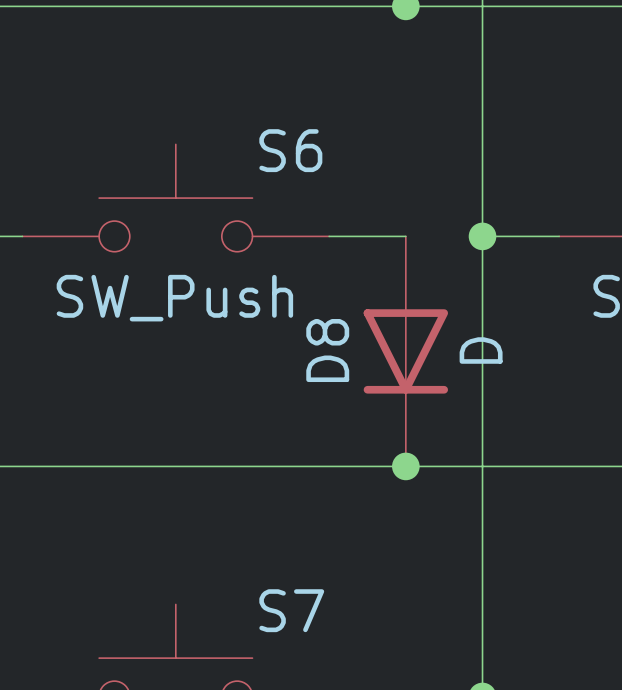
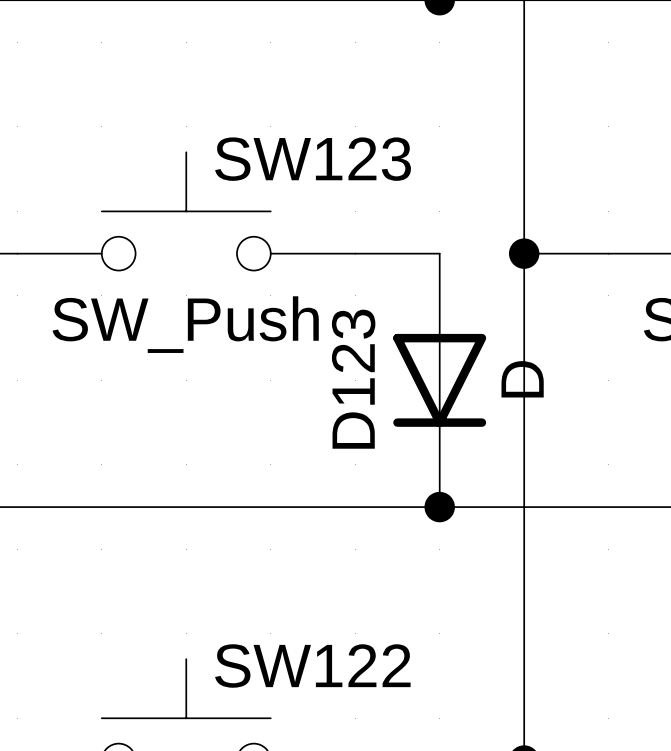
S6 name: S6 (290, 150) -> SW123 (313, 159)
D8 name: D8 (327, 350) -> D123 (353, 379)
S7 name: S7 (291, 610) -> SW122 (312, 665)

